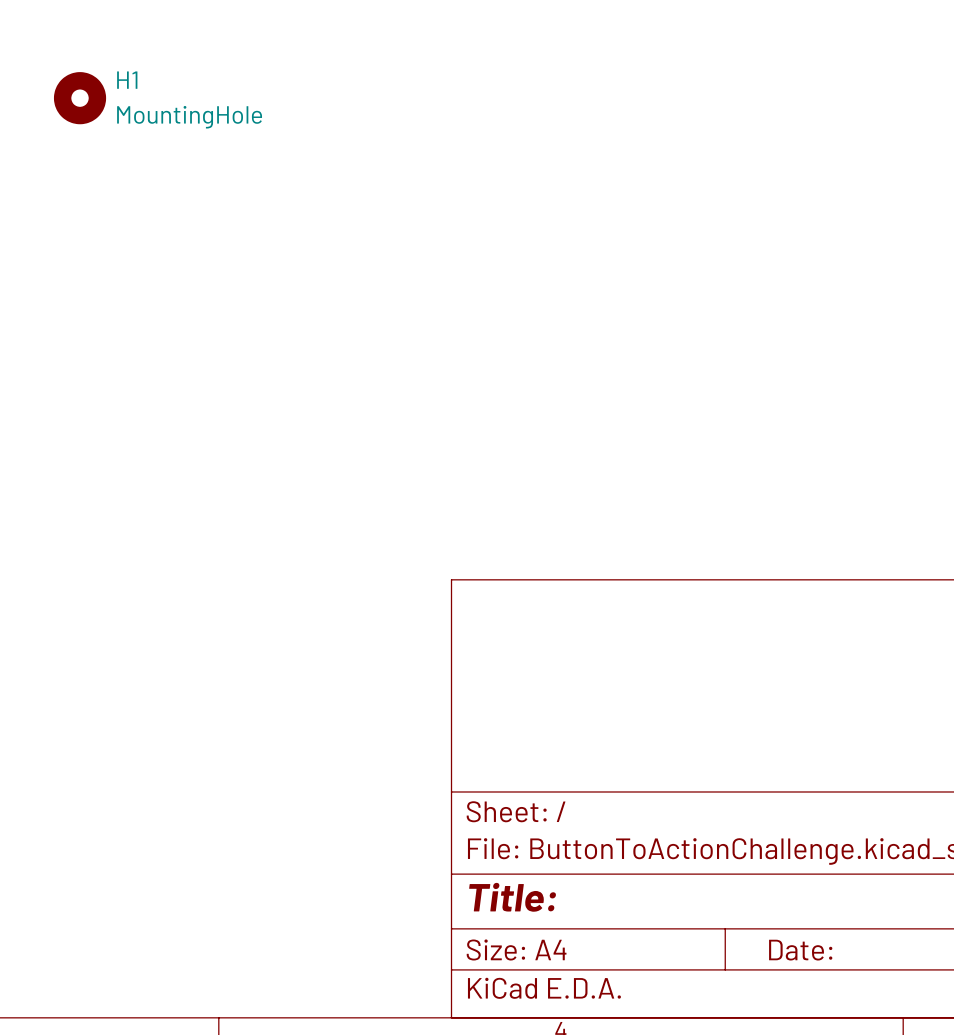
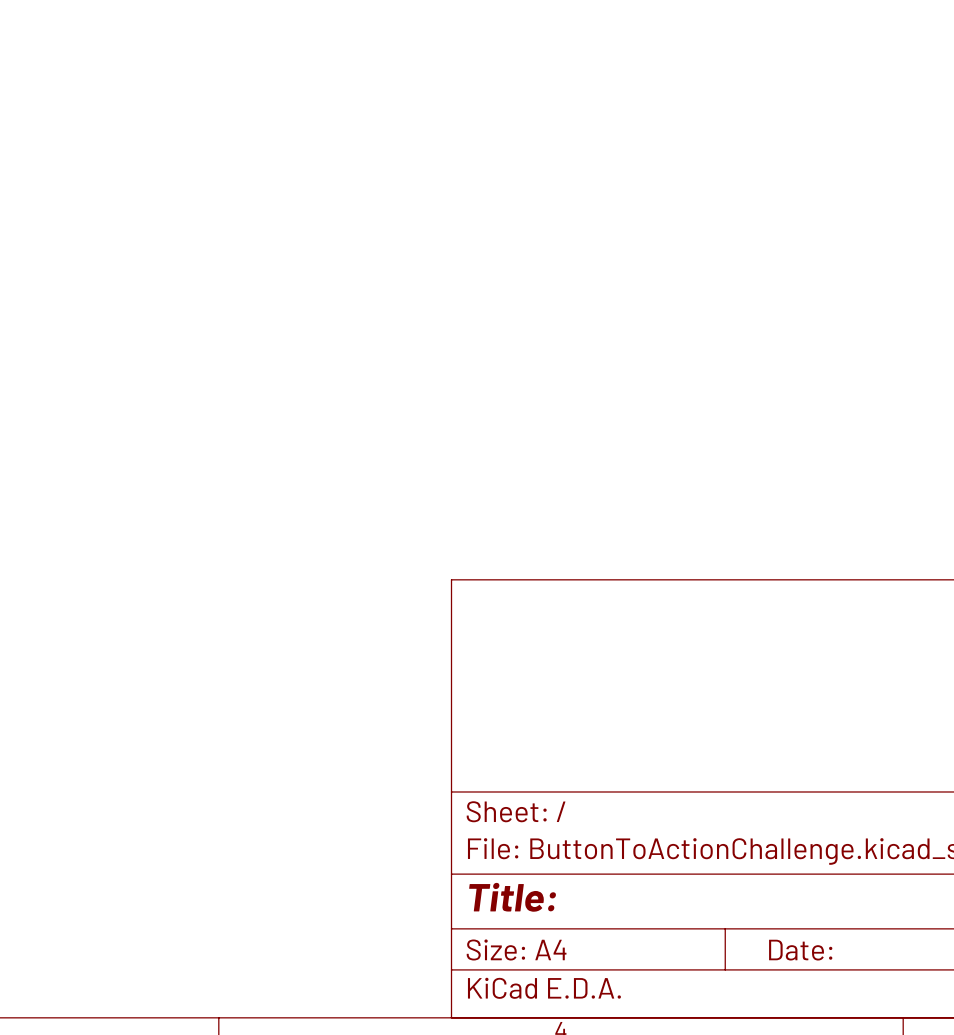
H1: MountingHole (80, 98) -> none

